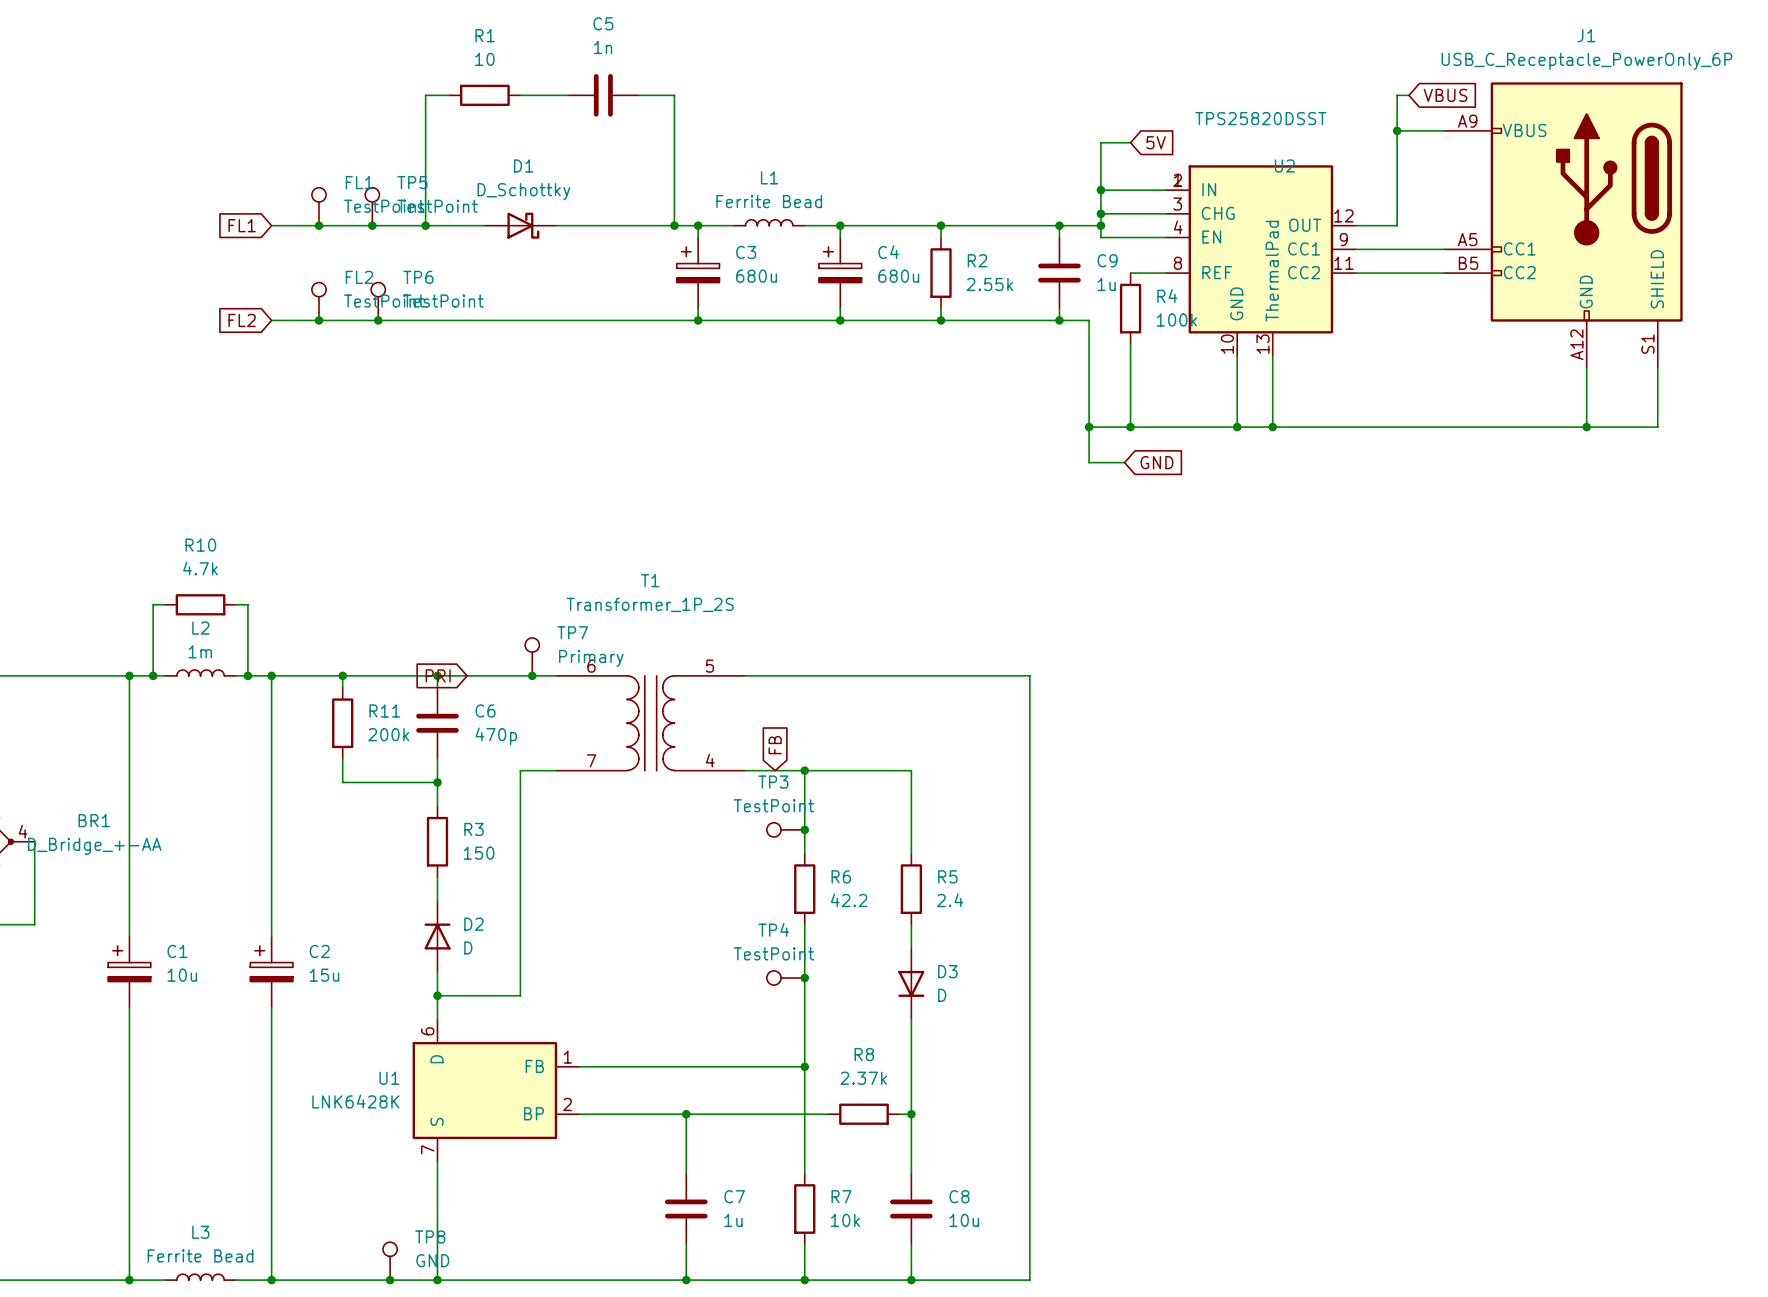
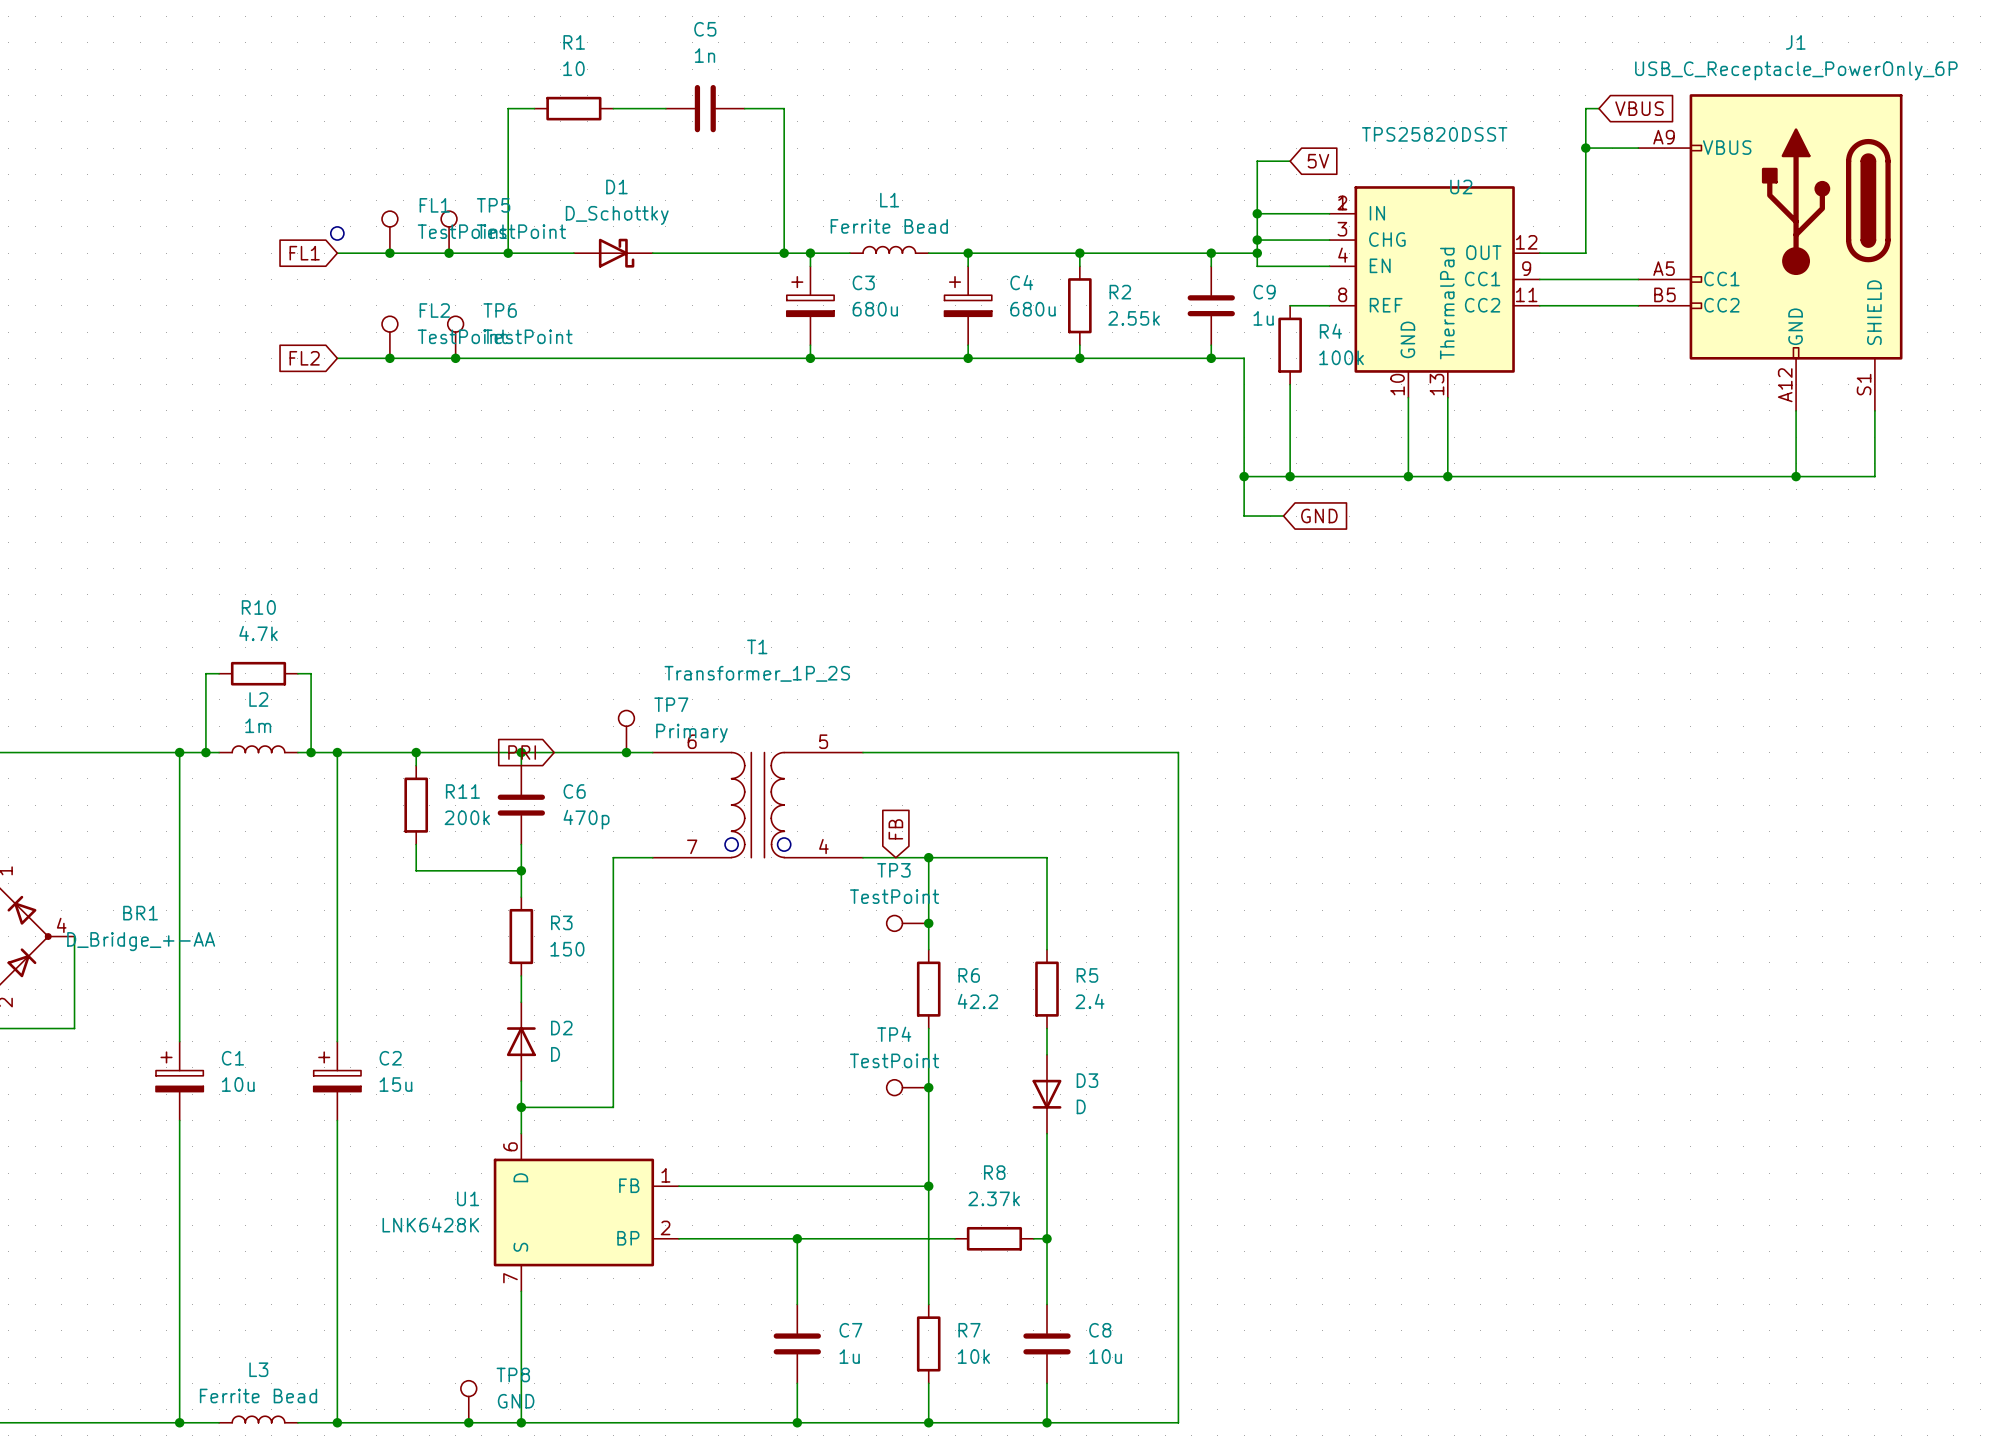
drawing: none -> [330, 226, 344, 241]
drawing: none -> [725, 837, 739, 852]
drawing: none -> [777, 837, 791, 852]

